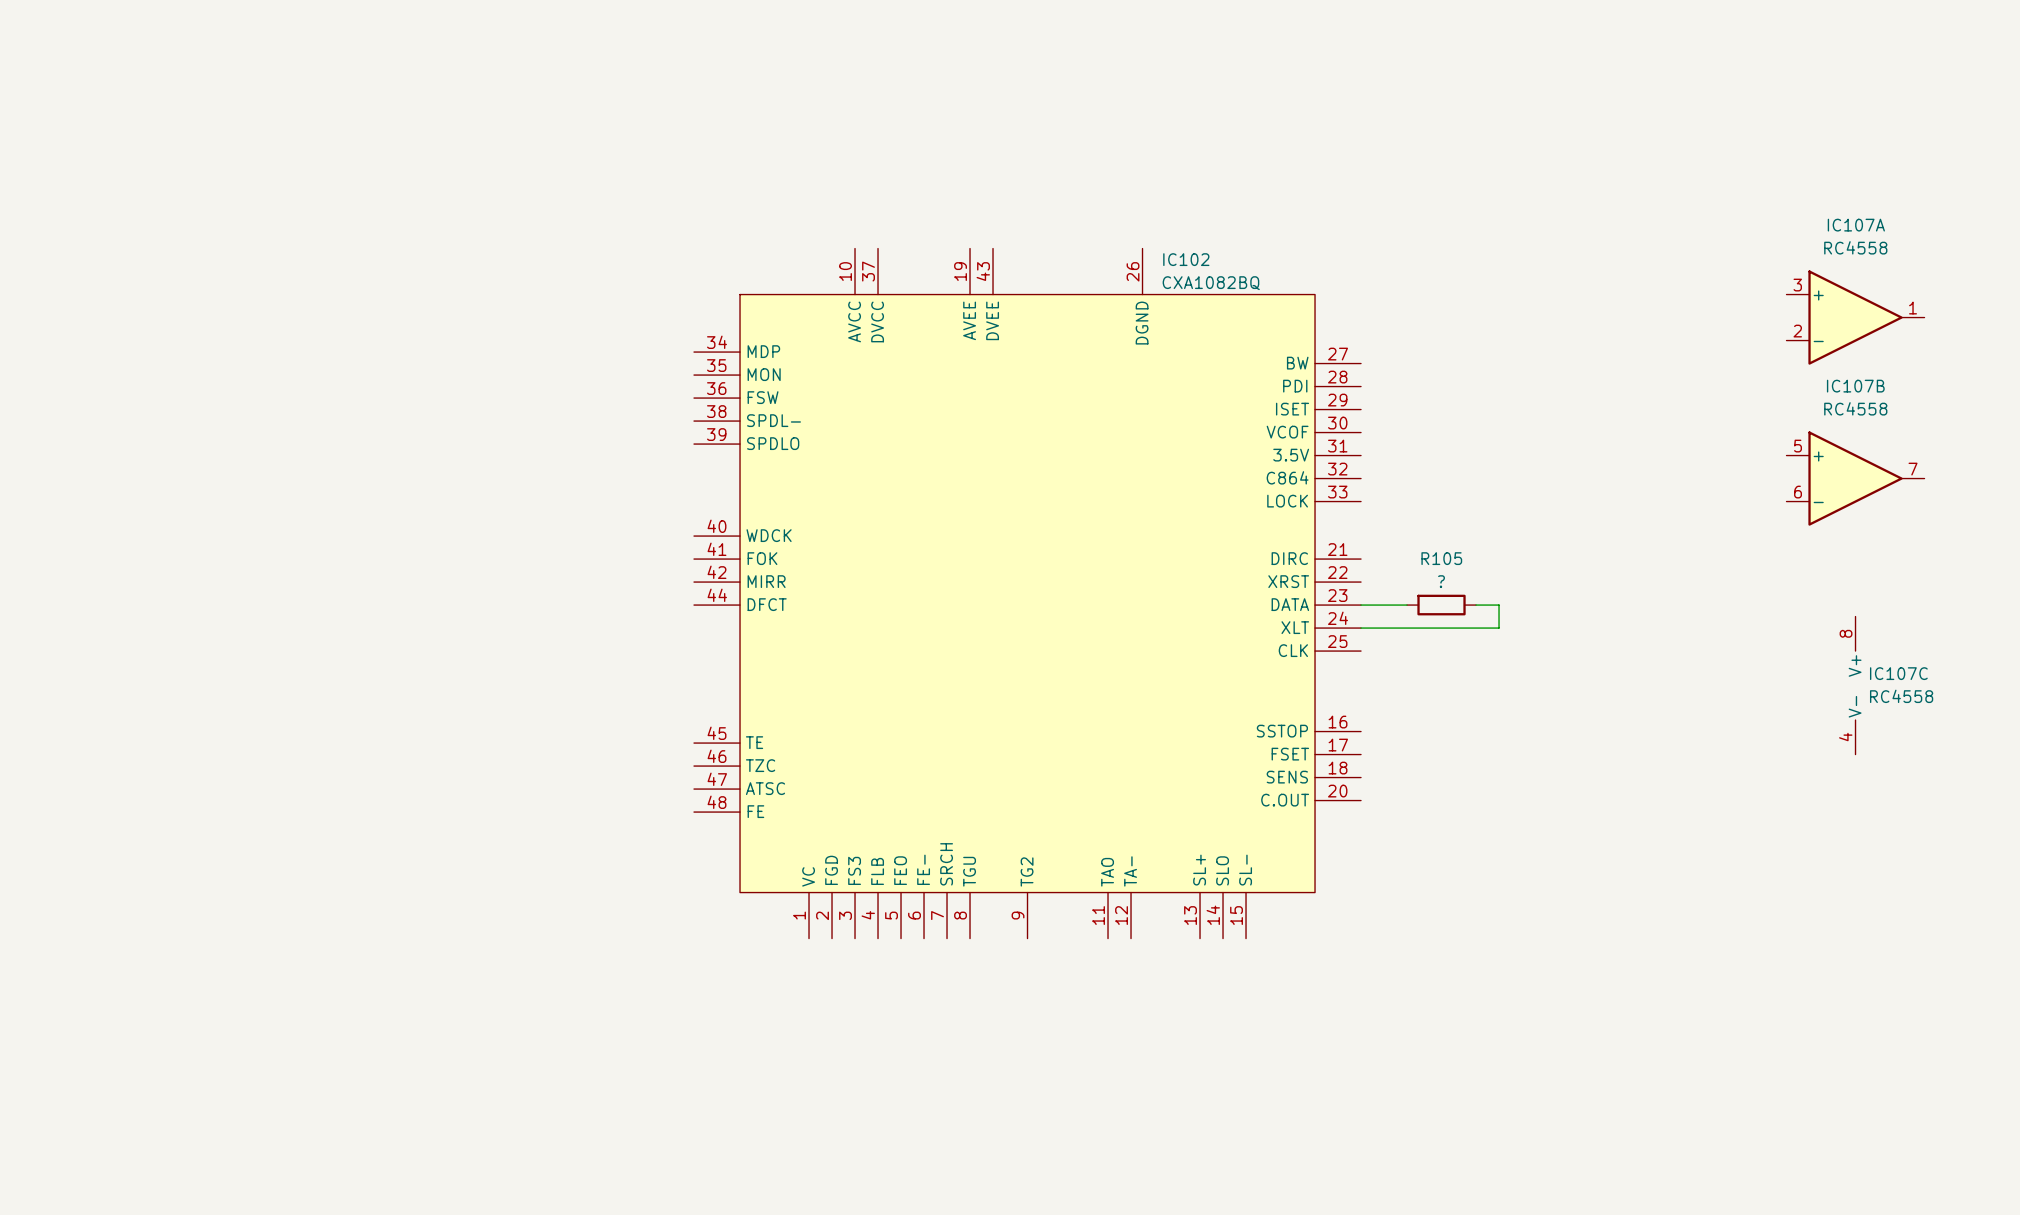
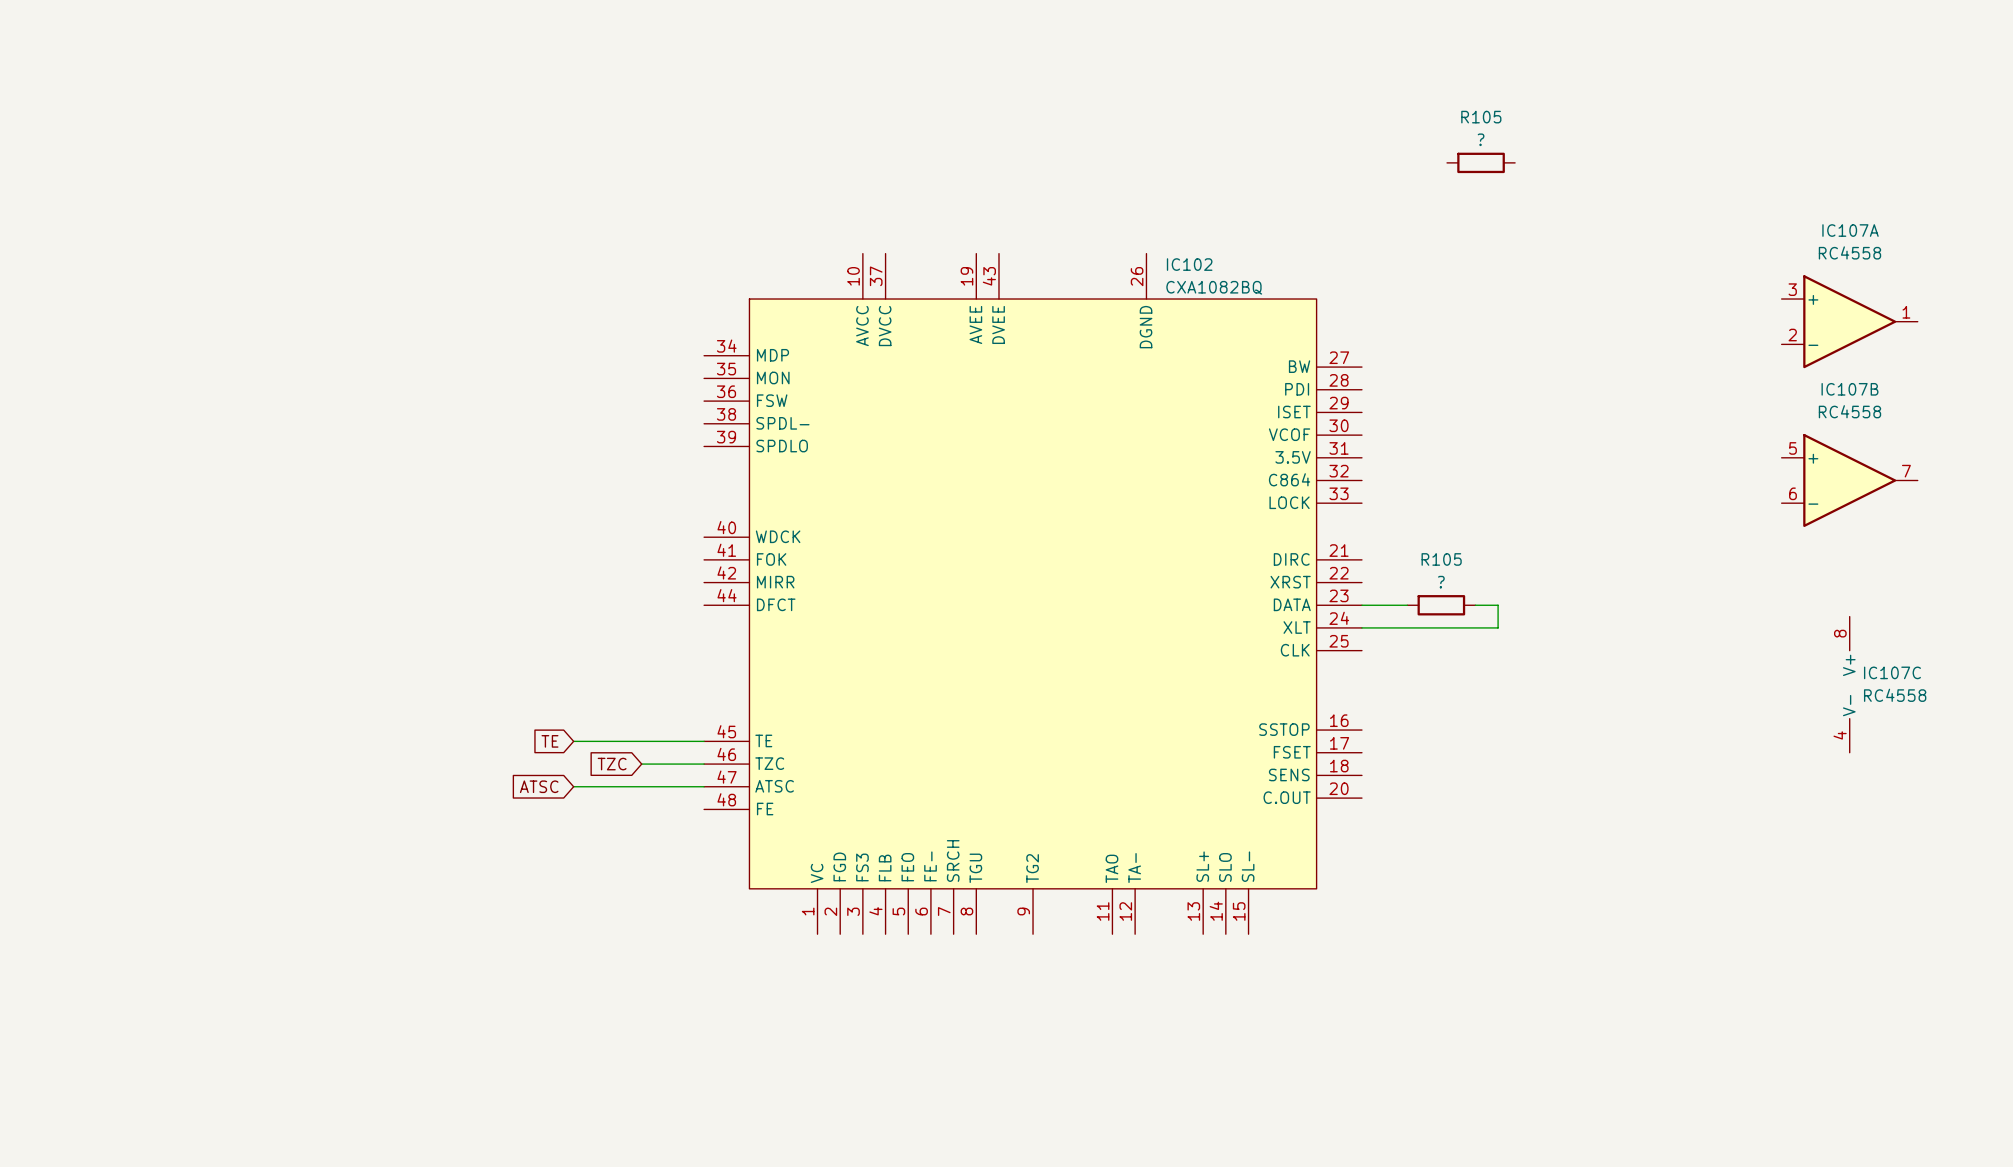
R105: none -> ? (1481, 162)
global label: none -> TE (549, 741)
wire: none -> (573, 741) (704, 741)
global label: none -> TZC (612, 764)
wire: none -> (641, 764) (704, 764)
global label: none -> ATSC (539, 786)
wire: none -> (573, 786) (704, 786)

